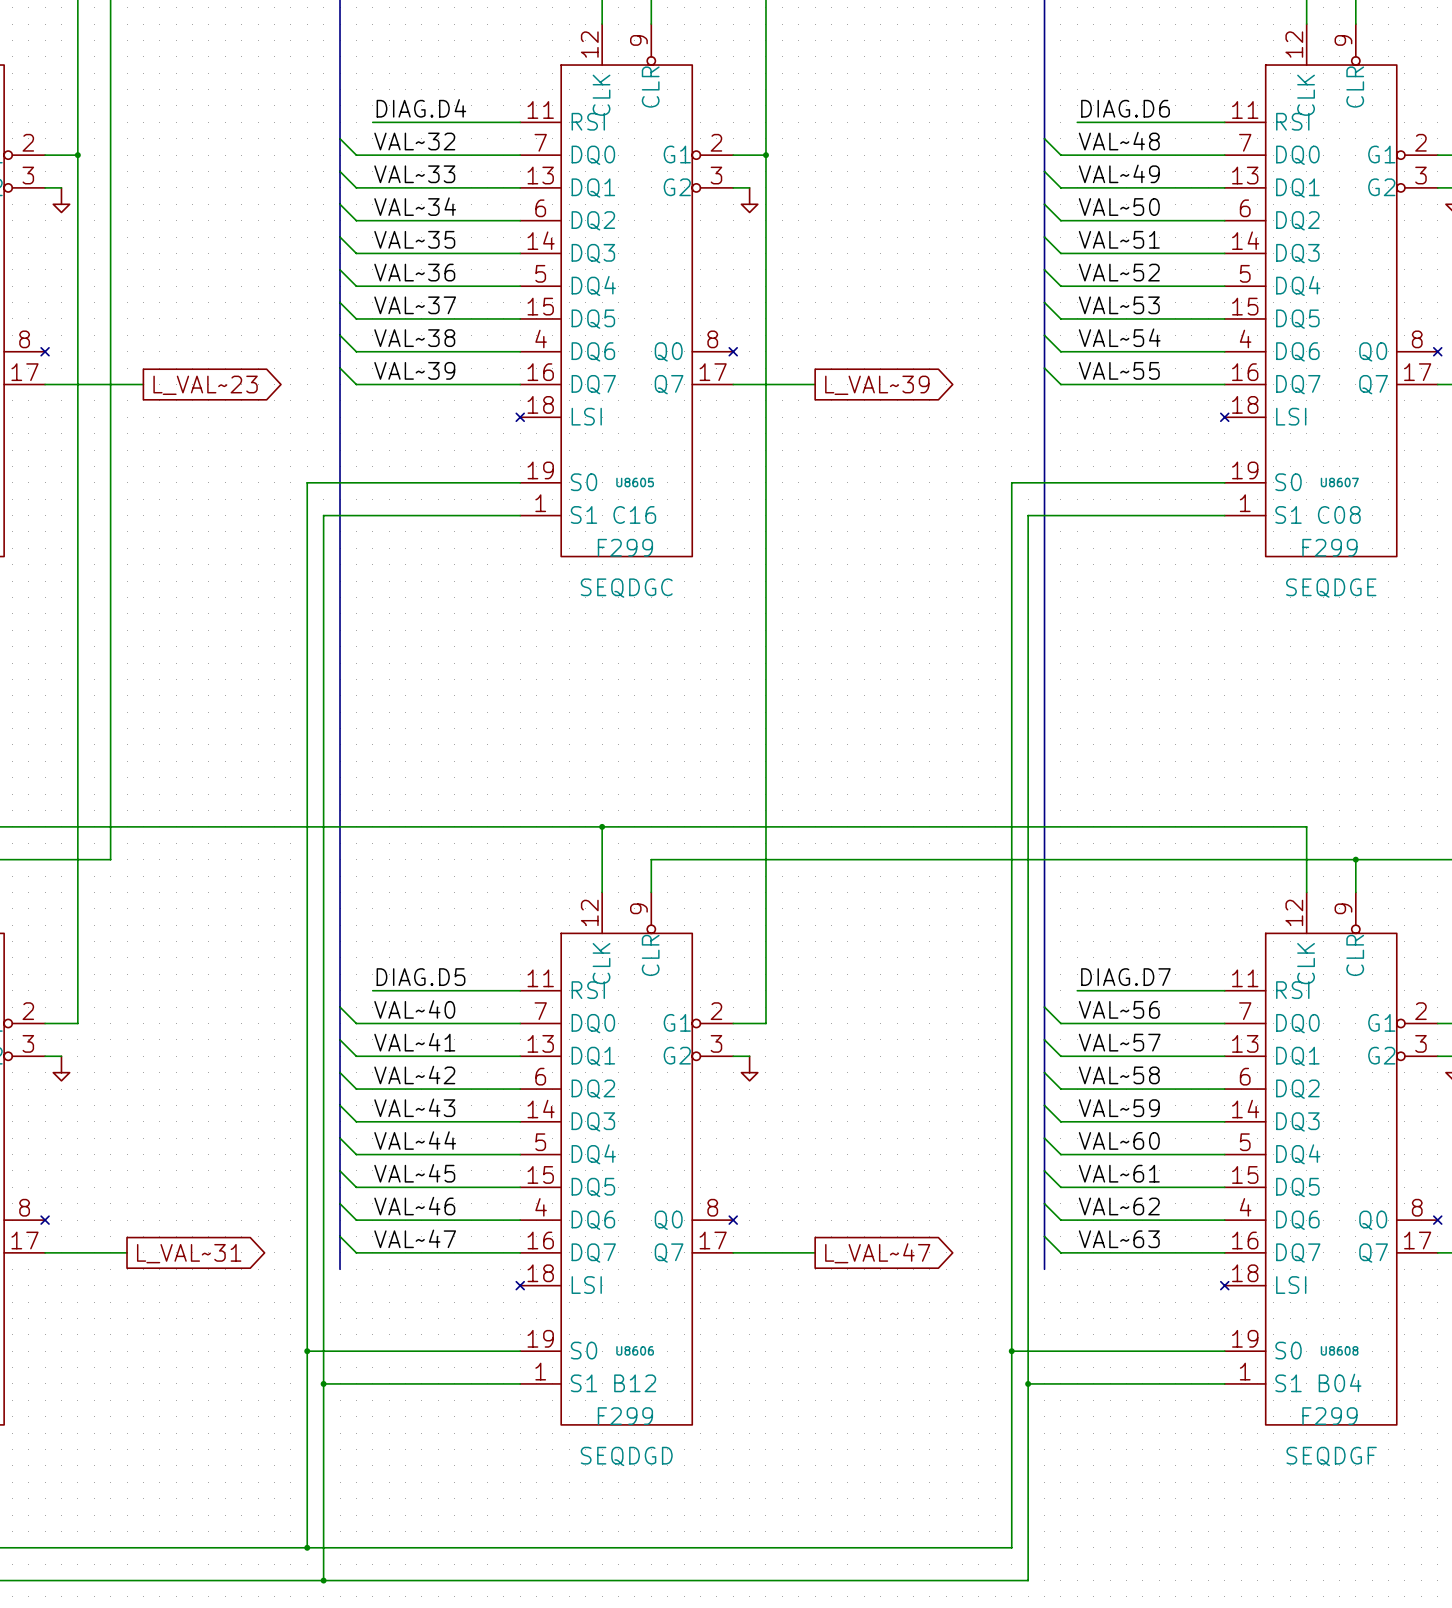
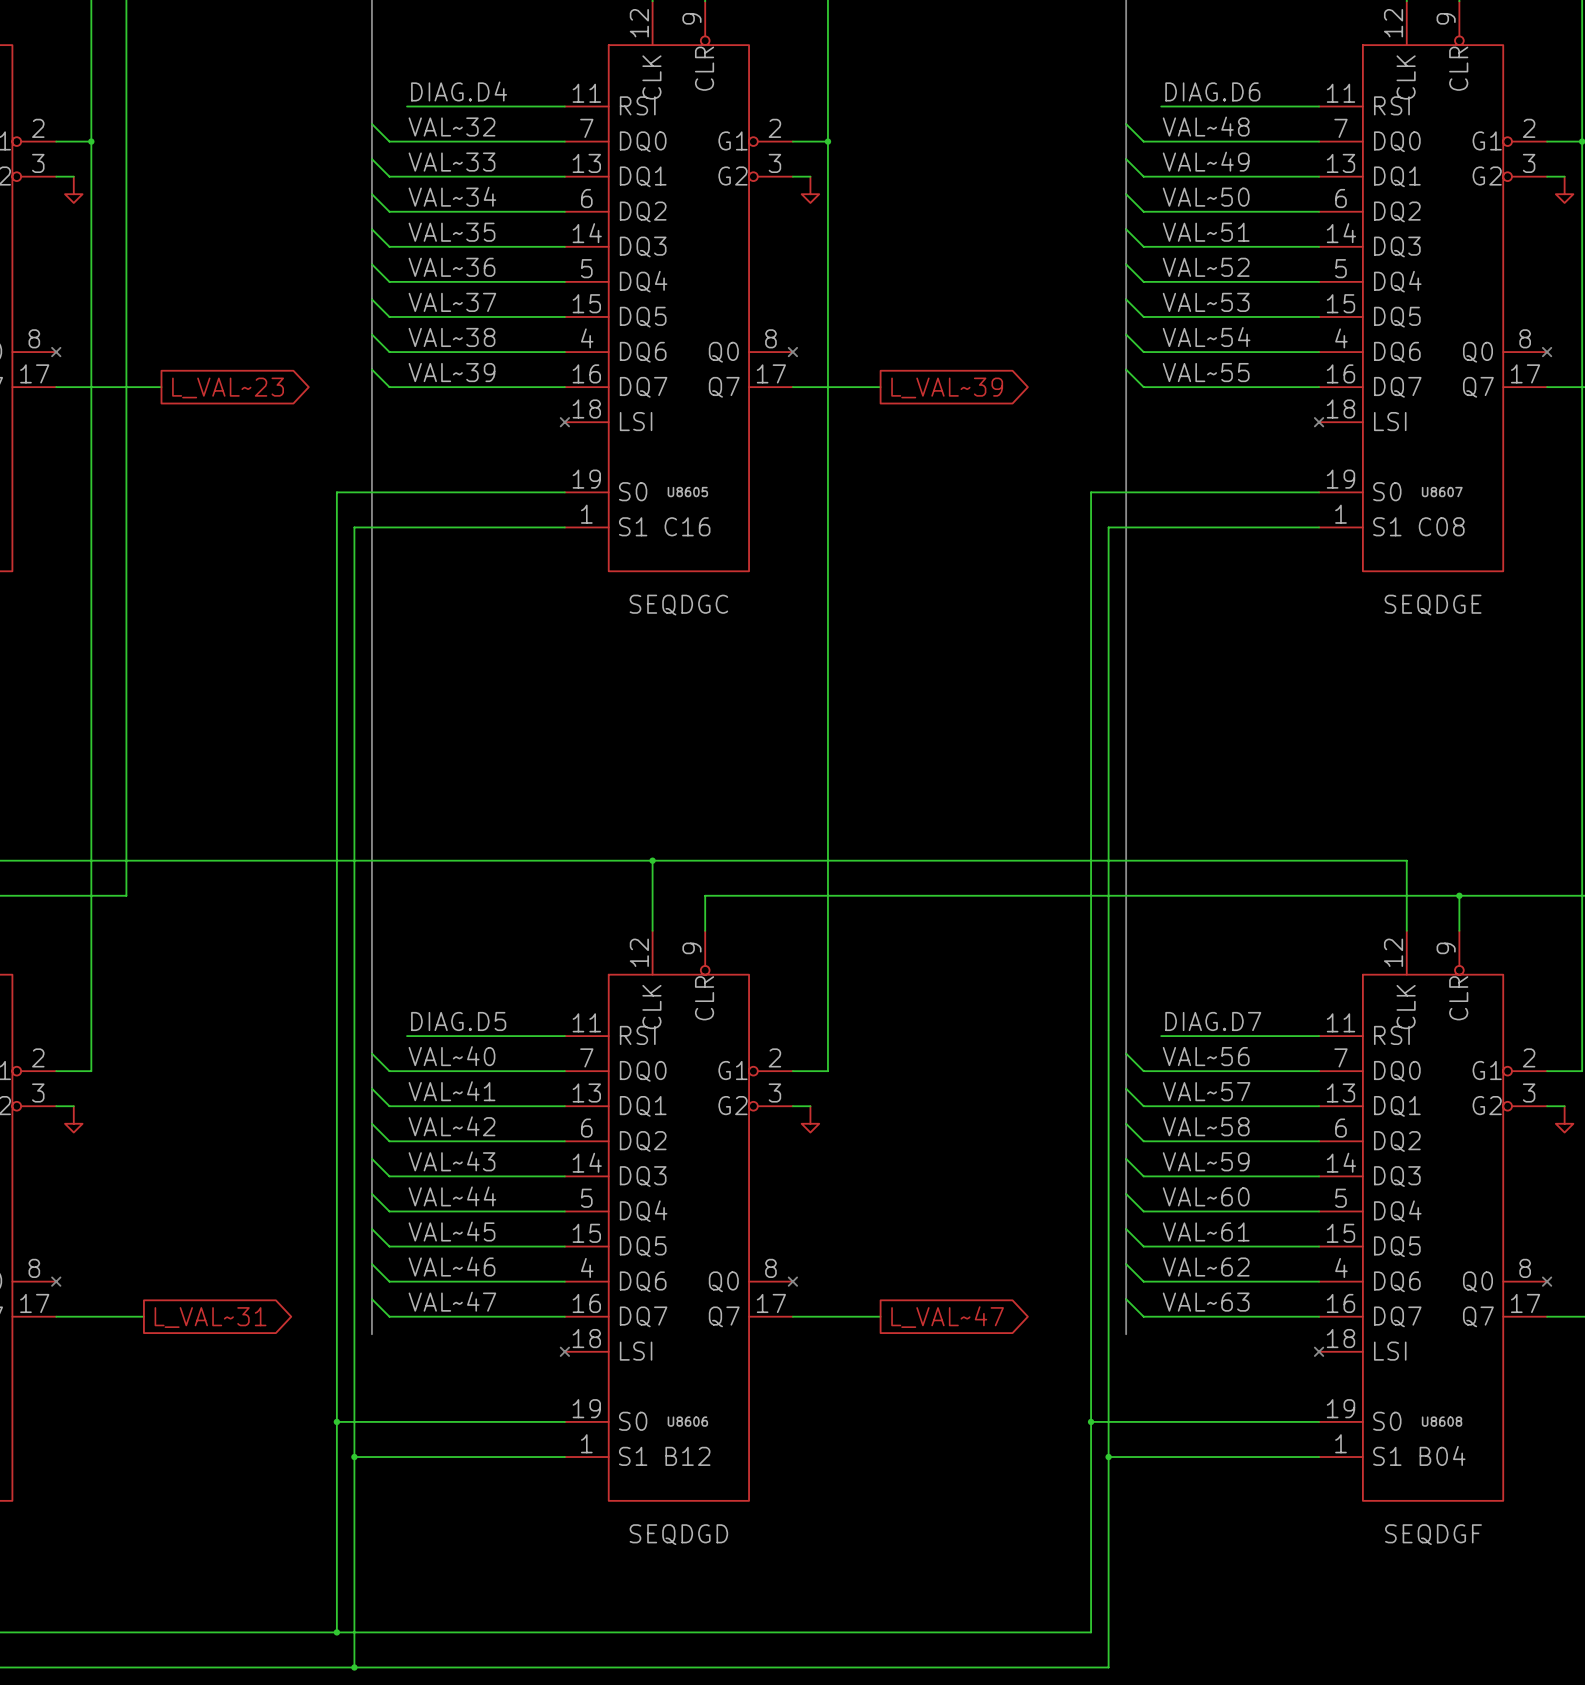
U8605 value: F299 (625, 547) -> none
U8607 value: F299 (1329, 547) -> none
U8606 value: F299 (625, 1416) -> none
U8608 value: F299 (1329, 1416) -> none

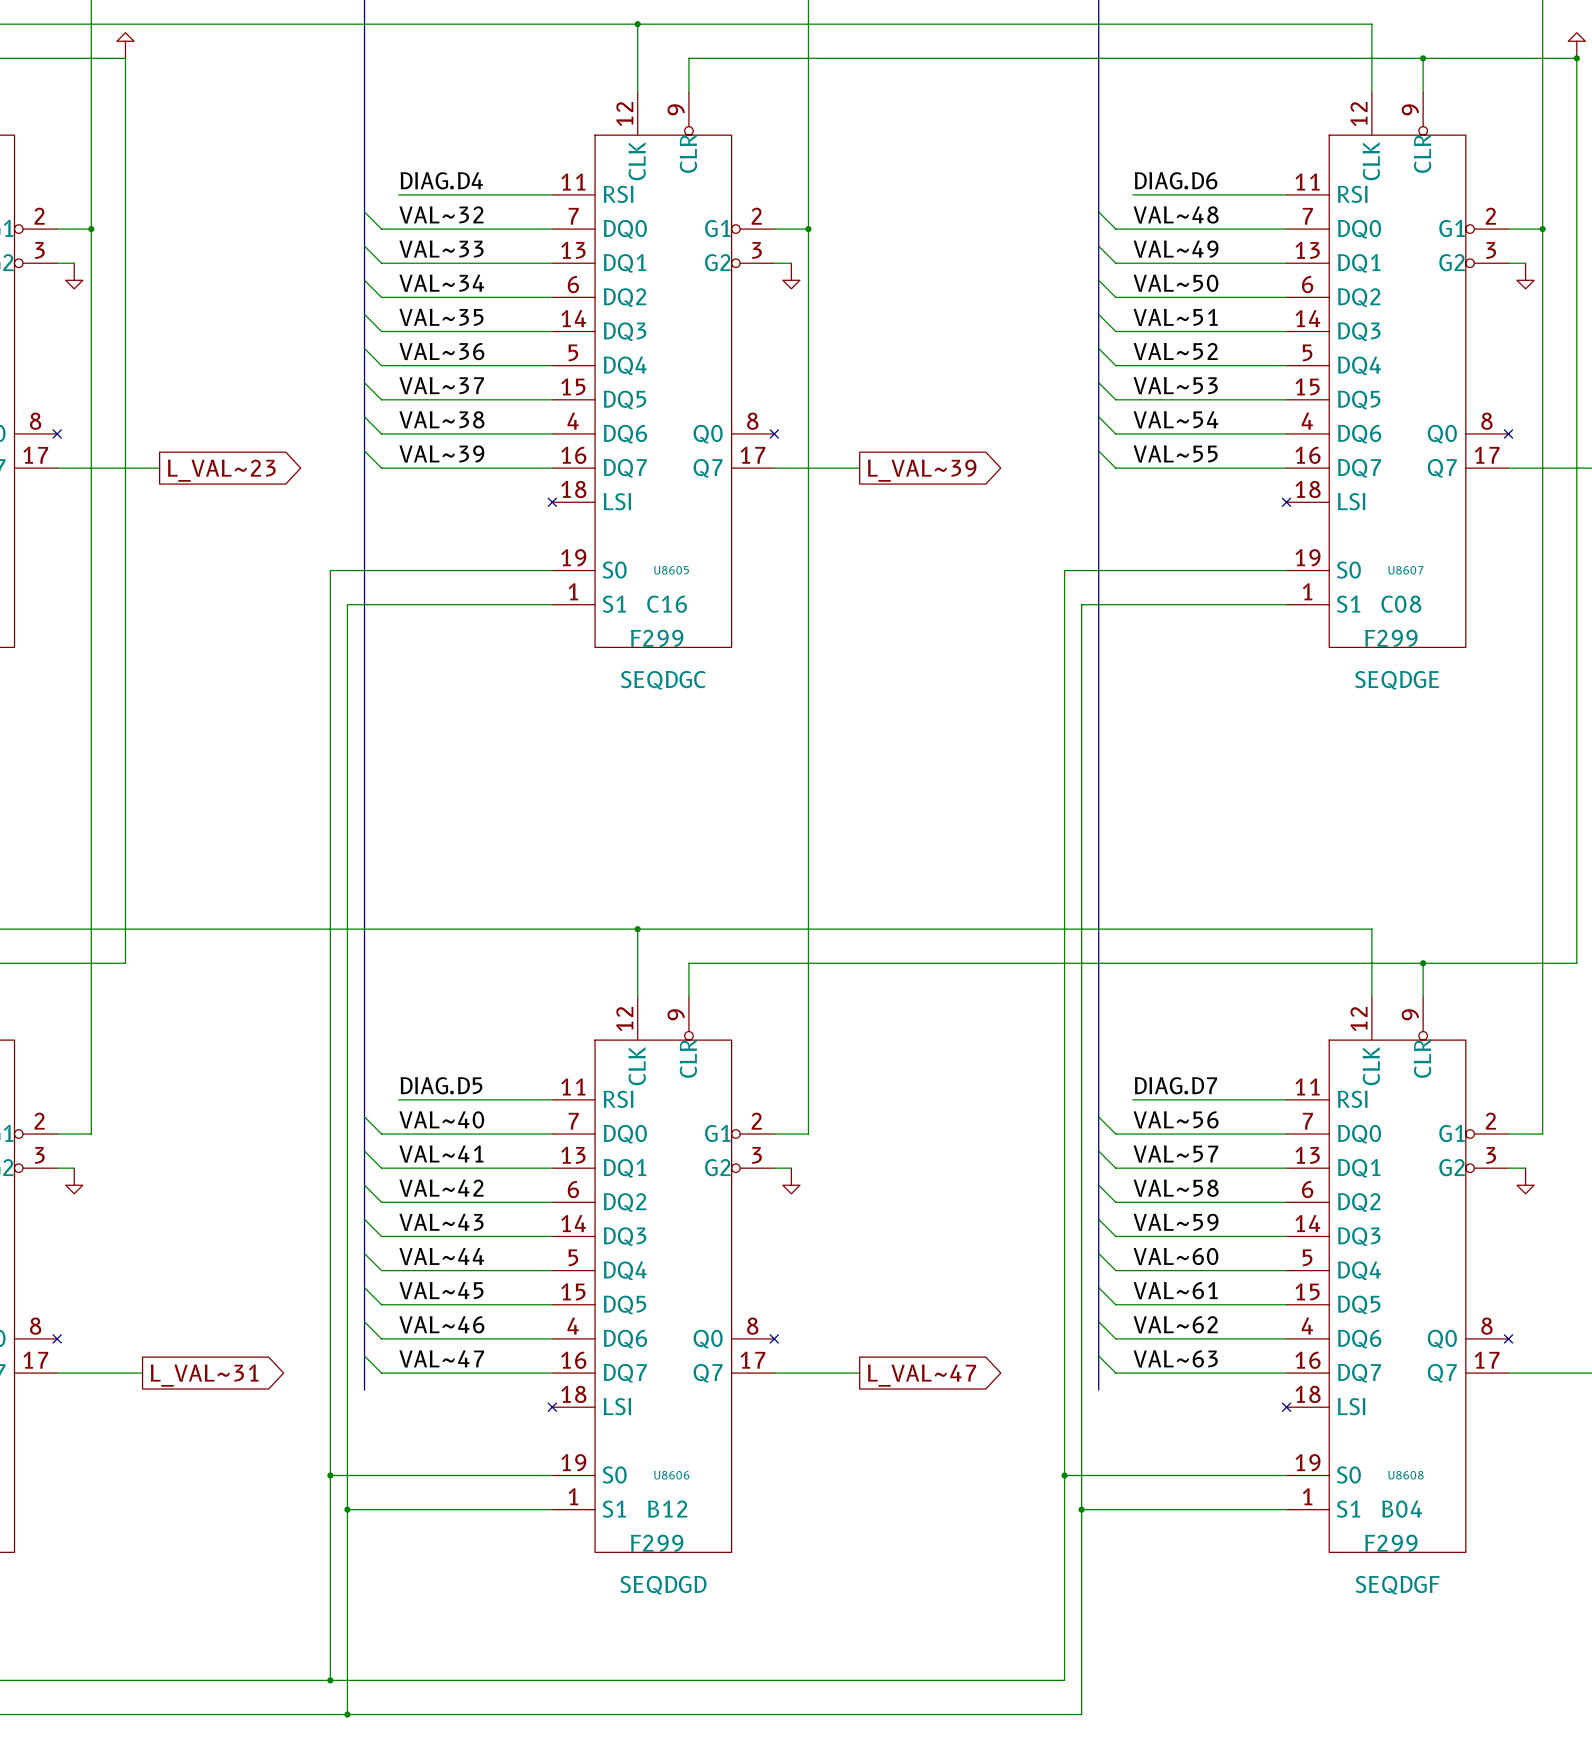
U8605 value: none -> F299 (657, 638)
U8607 value: none -> F299 (1391, 638)
U8606 value: none -> F299 (657, 1543)
U8608 value: none -> F299 (1391, 1543)

